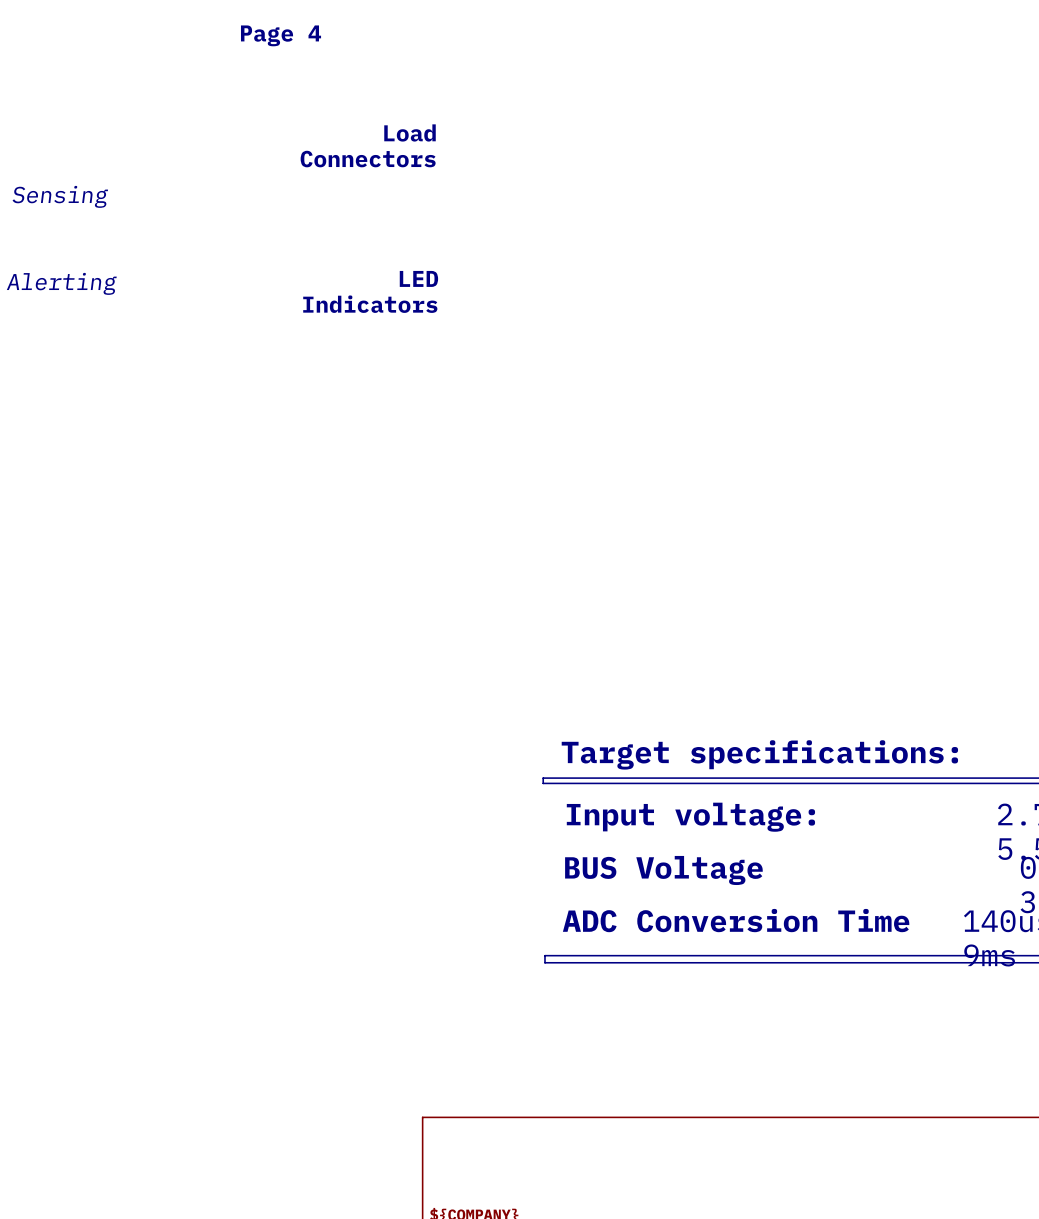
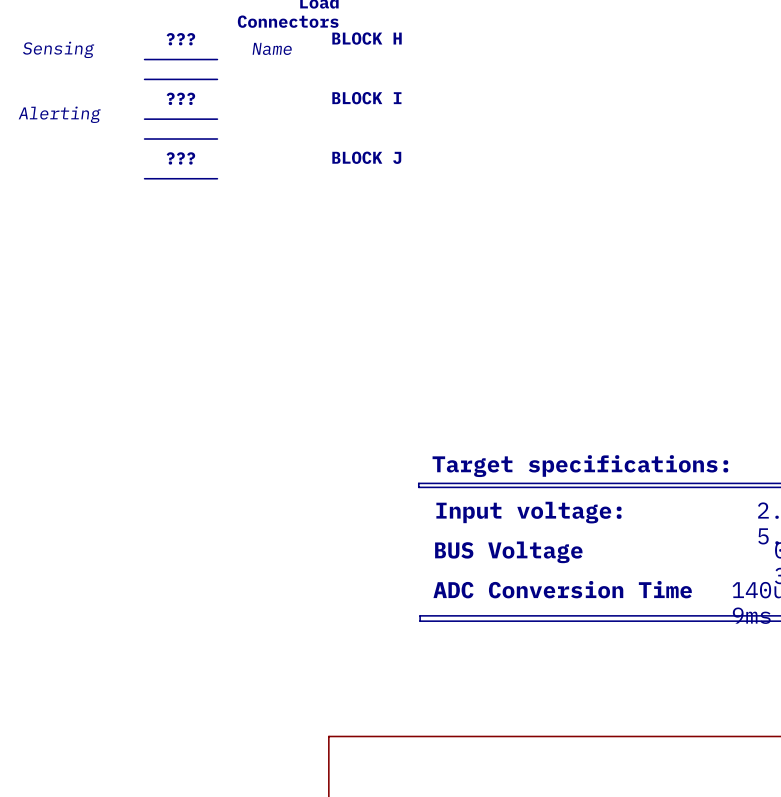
text: none -> BLOCK H (367, 38)
text: none -> ??? (180, 39)
text: none -> Name (272, 48)
line: none -> (144, 59) (217, 59)
line: none -> (144, 79) (217, 79)
text: none -> BLOCK I (366, 98)
text: none -> ??? (180, 98)
text: LED (418, 278) -> none
line: none -> (144, 119) (217, 119)
text: Indicators (370, 304) -> none
line: none -> (144, 139) (217, 139)
text: none -> BLOCK J (366, 157)
text: none -> ??? (180, 158)
line: none -> (144, 178) (217, 178)

